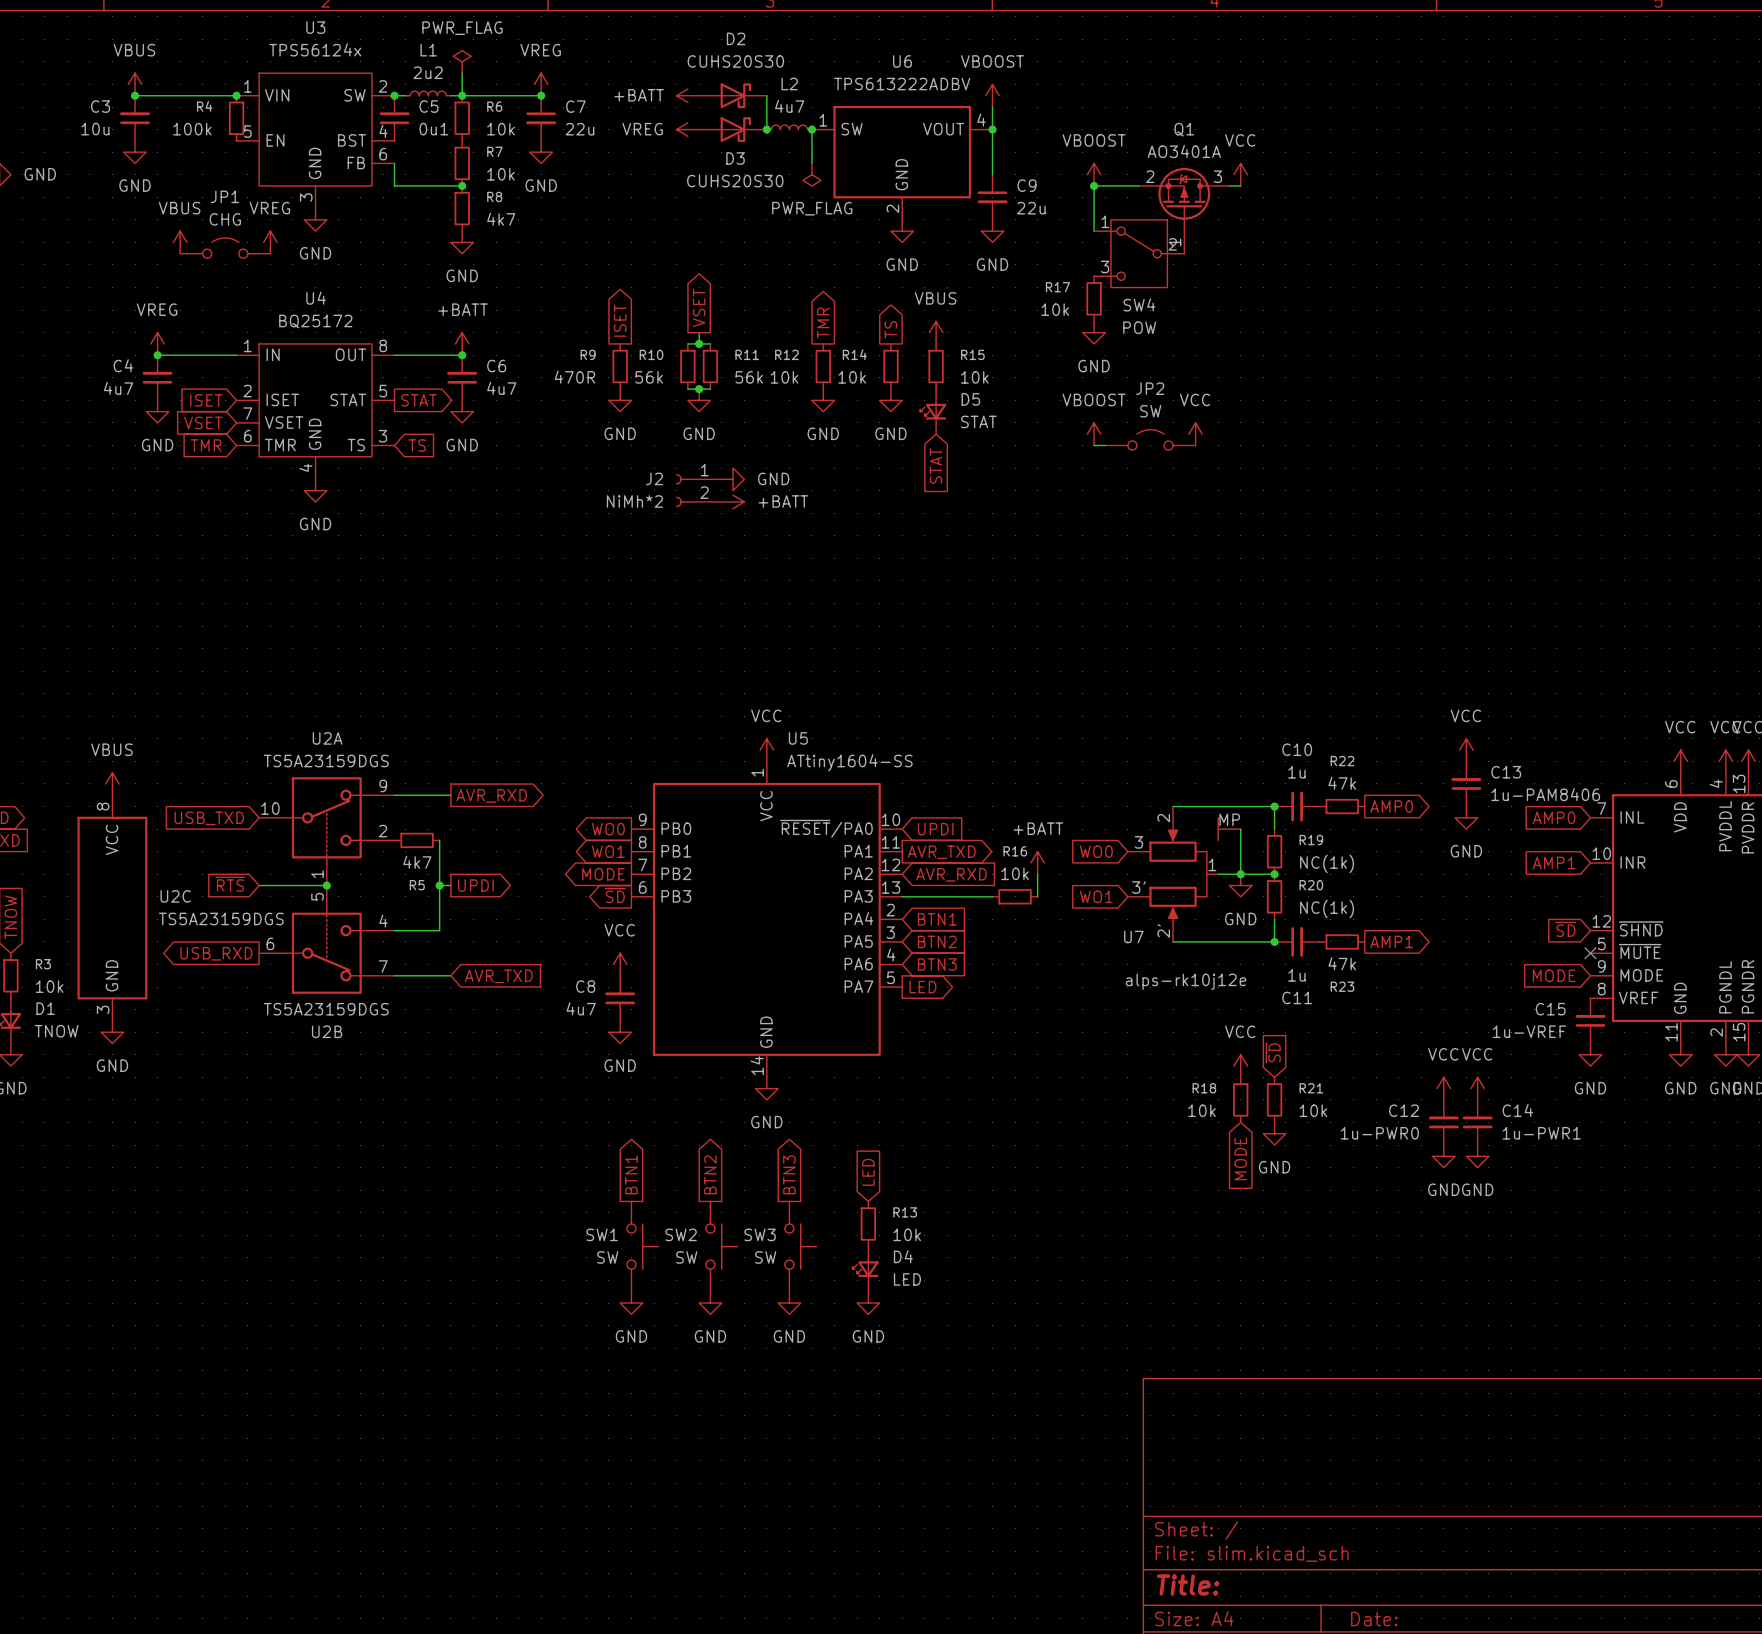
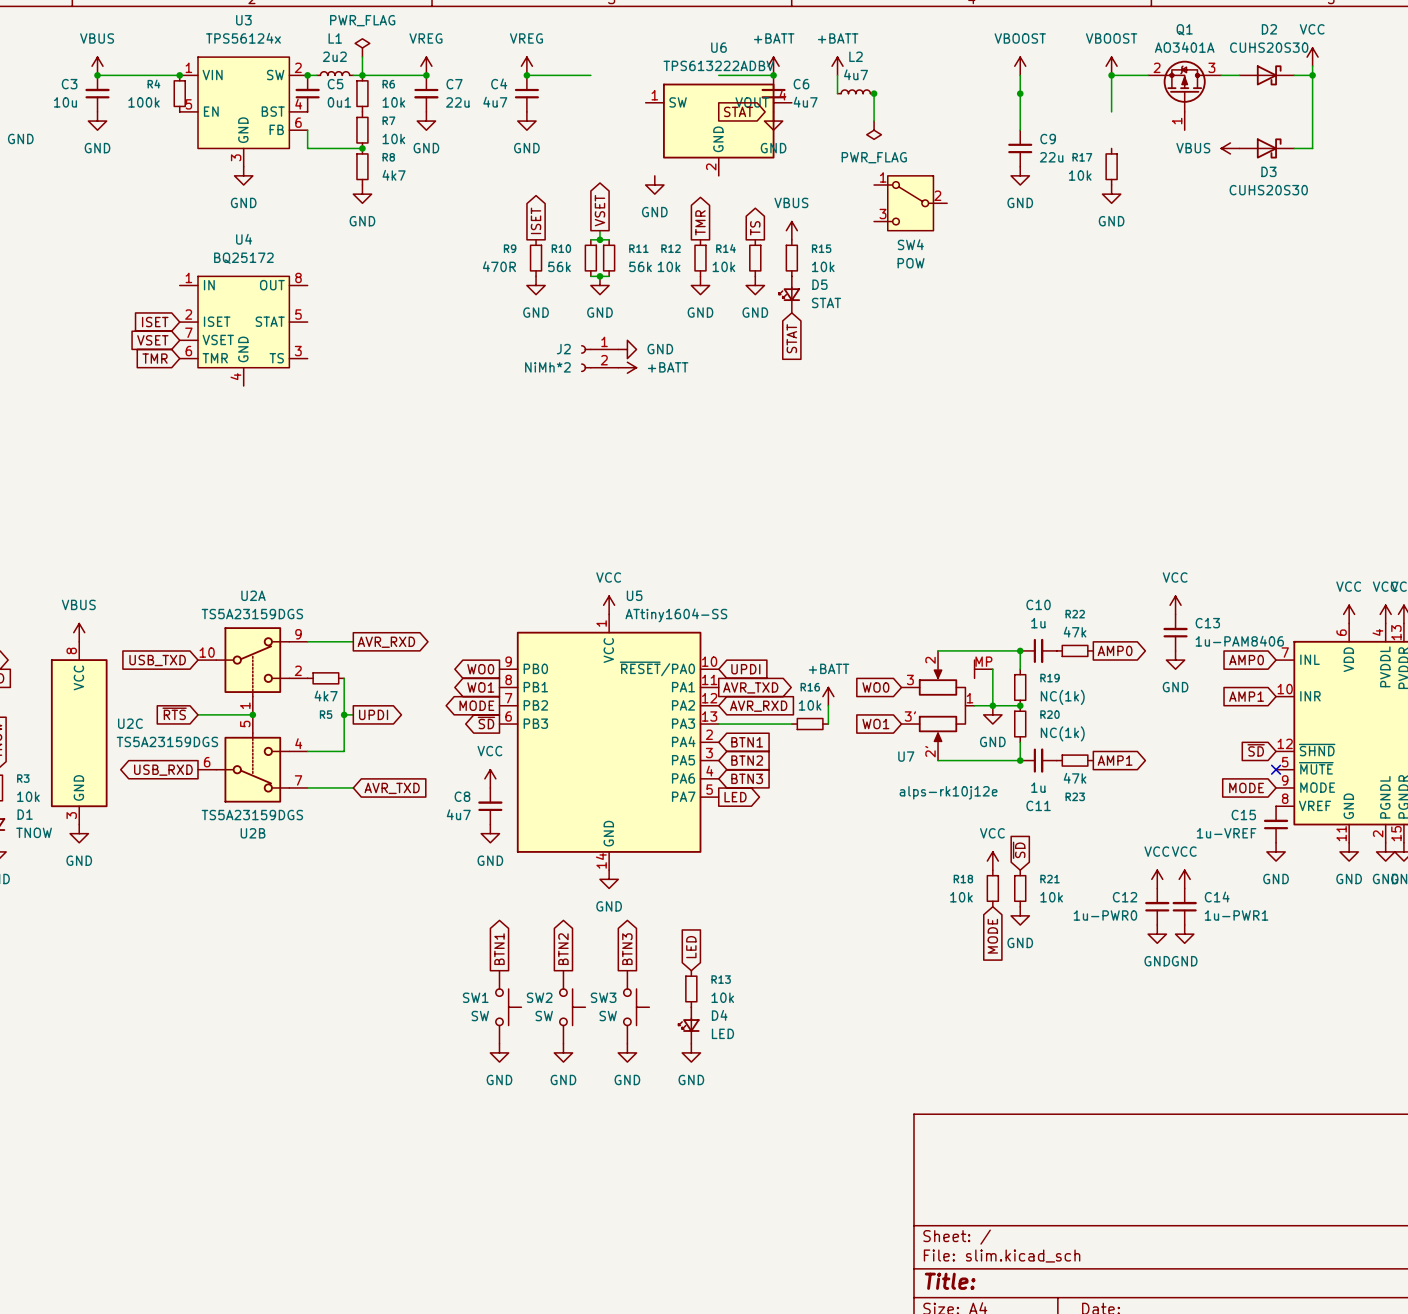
power symbol: none -> VCC (1312, 57)
power symbol: none -> +BATT (773, 66)
power symbol: none -> +BATT (837, 66)
power symbol: none -> VBOOST (1020, 66)
power symbol: none -> VBOOST (1111, 66)
wire: none -> (1312, 66) (1312, 148) (1294, 148)
junction: none -> (526, 75)
power symbol: +BATT (687, 95) -> none
D2 position: (733, 95) -> (1266, 75)
wire: (766, 95) (766, 129) -> none
wire: none -> (718, 75) (773, 75)
power symbol: VBOOST (992, 95) -> none
wire: none -> (837, 75) (837, 93)
wire: none -> (1020, 75) (1020, 130)
junction: none -> (1111, 75)
wire: none -> (1148, 75) (1111, 75) (1111, 111)
wire: none -> (1221, 75) (1239, 75)
wire: none -> (1294, 75) (1312, 75)
junction: none -> (1312, 75)
wire: (992, 107) (992, 174) -> none
wire: none -> (874, 93) (874, 121)
junction: none -> (874, 93)
junction: none -> (1020, 93)
L2 position: (789, 127) -> (855, 91)
power symbol rotation: 0° (687, 129) -> 90° clockwise (526, 66)
power symbol position: VREG (687, 129) -> VREG (526, 66)
D3 position: (733, 129) -> (1266, 148)
junction: (766, 129) -> none
wire: (811, 129) (811, 163) -> none
junction: (811, 129) -> none
junction position: (992, 129) -> (773, 75)
global label: none -> STAT (738, 111)
power symbol: none -> GND (526, 121)
power symbol: none -> GND (773, 121)
power symbol: none -> PWR_FLAG (874, 130)
power symbol: PWR_FLAG (811, 174) -> none
C9 symbol: [977, 174, 1008, 220] -> [1008, 130, 1033, 167]
power symbol: VBOOST (1094, 174) -> none
power symbol: VCC (1240, 174) -> none
junction: (1094, 186) -> none
wire: (1139, 186) (1094, 186) (1094, 231) -> none
wire: (1229, 186) (1240, 186) -> none
power symbol: none -> VBUS (1230, 148)
Q1 position: (1184, 210) -> (1184, 95)
power symbol: none -> GND (1020, 175)
power symbol: none -> GND (654, 185)
power symbol: GND (902, 231) -> none
power symbol: GND (992, 231) -> none
power symbol: VBUS (180, 242) -> none
power symbol: VREG (270, 242) -> none
power symbol: none -> GND (1111, 194)
JP1: CHG (225, 248) -> none
junction: none -> (599, 239)
R17 position: (1094, 298) -> (1111, 166)
global label position: VSET (699, 307) -> VSET (599, 210)
global label position: ISET (620, 320) -> ISET (536, 220)
global label position: TMR (823, 322) -> TMR (700, 222)
global label position: TS (890, 329) -> TS (755, 228)
wire: (699, 332) (699, 343) -> (599, 230) (599, 239)
power symbol position: VBUS (936, 332) -> VBUS (791, 230)
power symbol: GND (1094, 332) -> none
power symbol: VREG (157, 343) -> none
power symbol: +BATT (462, 343) -> none
wire: (687, 343) (710, 343) -> (590, 239) (609, 239)
junction: (699, 343) -> none
junction: none -> (599, 276)
C4 symbol: [142, 355, 173, 401] -> [514, 75, 539, 112]
wire: (157, 355) (236, 355) -> none
junction: (157, 355) -> none
wire: (394, 355) (462, 355) -> none
C6 symbol: [447, 355, 478, 401] -> [761, 75, 786, 112]
junction: (462, 355) -> none
power symbol: none -> GND (536, 285)
power symbol: none -> GND (599, 285)
power symbol: none -> GND (700, 285)
power symbol: none -> GND (755, 285)
R9 position: (620, 366) -> (536, 258)
R10 position: (687, 366) -> (590, 258)
R11 position: (710, 366) -> (609, 258)
R12 position: (823, 366) -> (700, 258)
R14 position: (890, 366) -> (755, 258)
R15 position: (936, 366) -> (791, 258)
wire: (687, 389) (710, 389) -> (590, 276) (609, 276)
junction: (699, 389) -> none
global label: STAT (418, 400) -> none
power symbol: GND (620, 400) -> none
power symbol: GND (699, 400) -> none
power symbol: GND (823, 400) -> none
power symbol: GND (890, 400) -> none
power symbol: GND (157, 411) -> none
power symbol: GND (462, 411) -> none
D5 position: (933, 411) -> (789, 294)
power symbol: none -> GND (627, 349)
power symbol: VBOOST (1094, 434) -> none
power symbol: VCC (1195, 434) -> none
JP2: SW (1150, 439) -> none
global label: TS (417, 445) -> none
wire: (1094, 445) (1105, 445) -> none
global label position: STAT (936, 466) -> STAT (791, 338)
power symbol: GND (733, 479) -> none
power symbol: GND (315, 490) -> none
J2 position: (698, 490) -> (599, 358)
power symbol position: +BATT (733, 501) -> +BATT (627, 367)

